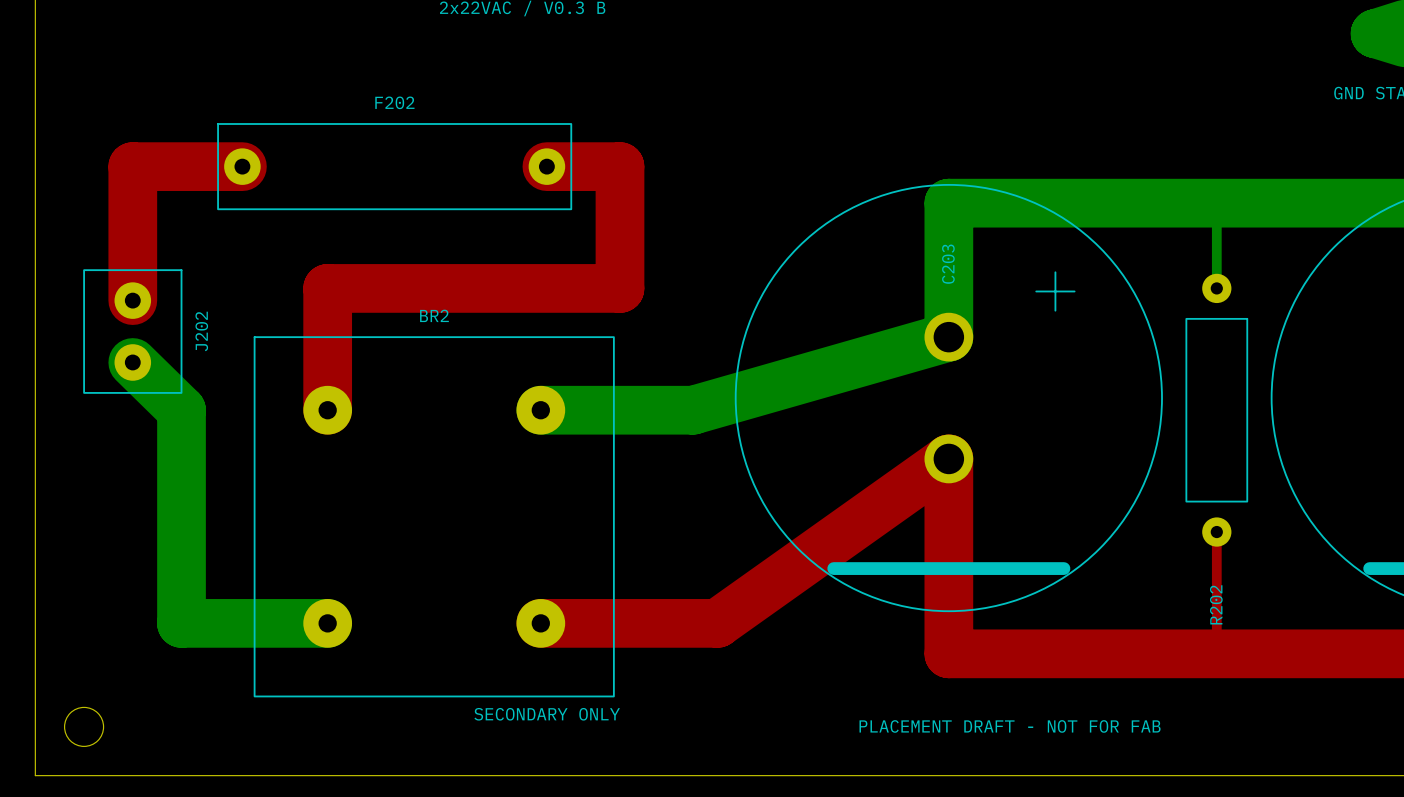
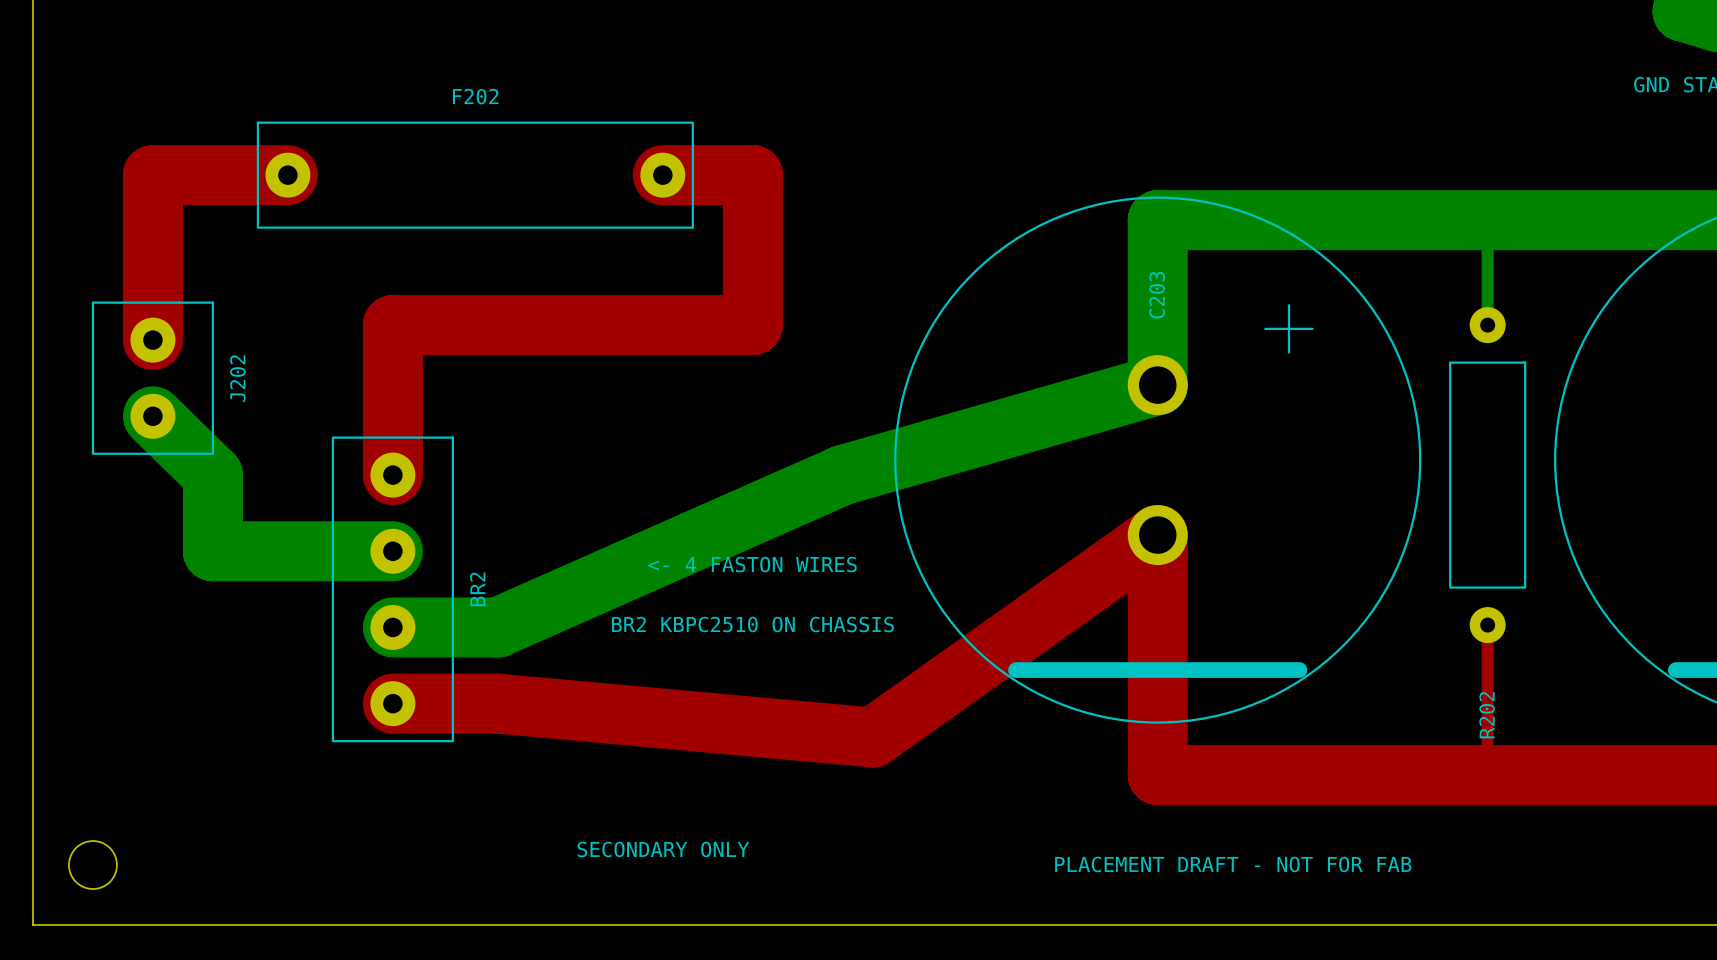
BR2 name position: BR2 (434, 315) -> BR2 (477, 589)
BR2 footprint: [253, 336, 615, 698] -> [331, 436, 455, 743]
bottom track: (540, 410) (693, 410) -> (392, 627) (497, 627) (842, 475)
bottom track: (181, 472) (181, 623) (327, 623) -> (212, 551) (392, 551)
text: none -> <- 4 FASTON WIRES (752, 564)
text: none -> BR2 KBPC2510 ON CHASSIS (752, 624)
top track: (540, 623) (717, 623) -> (392, 703) (497, 703) (872, 737)

